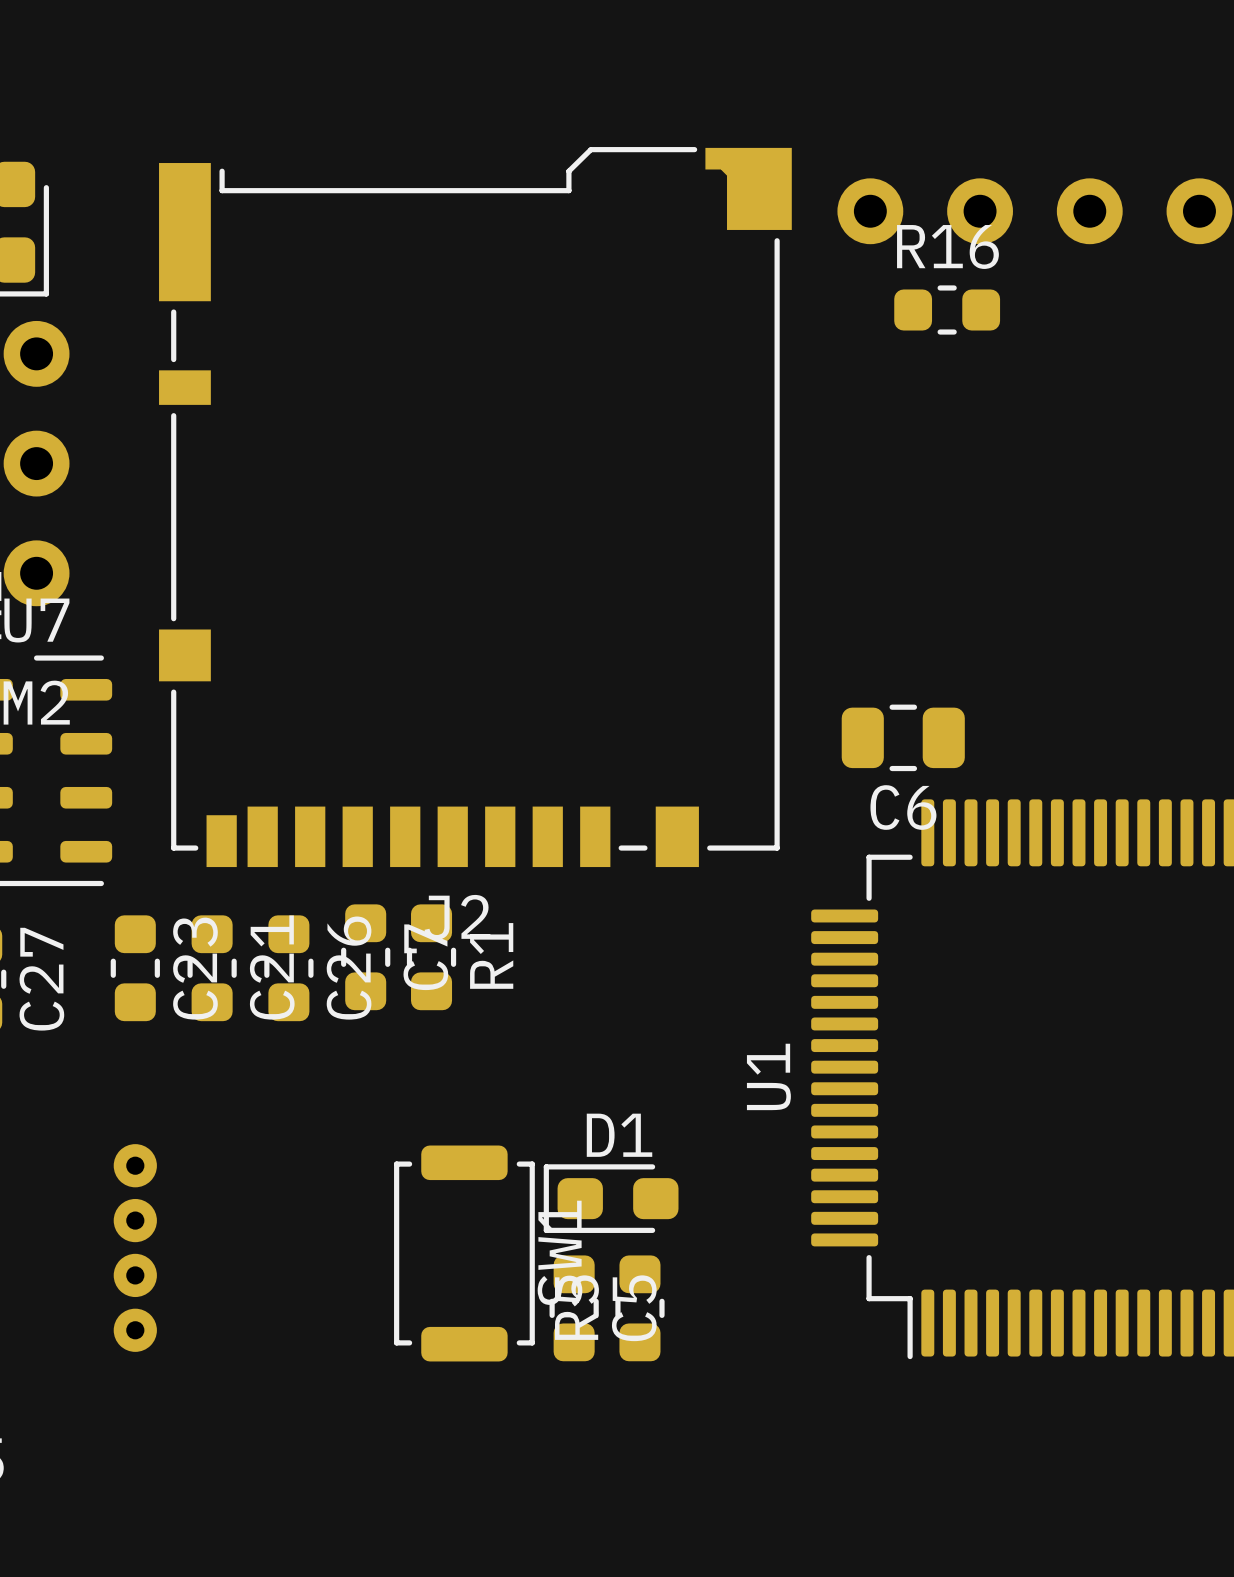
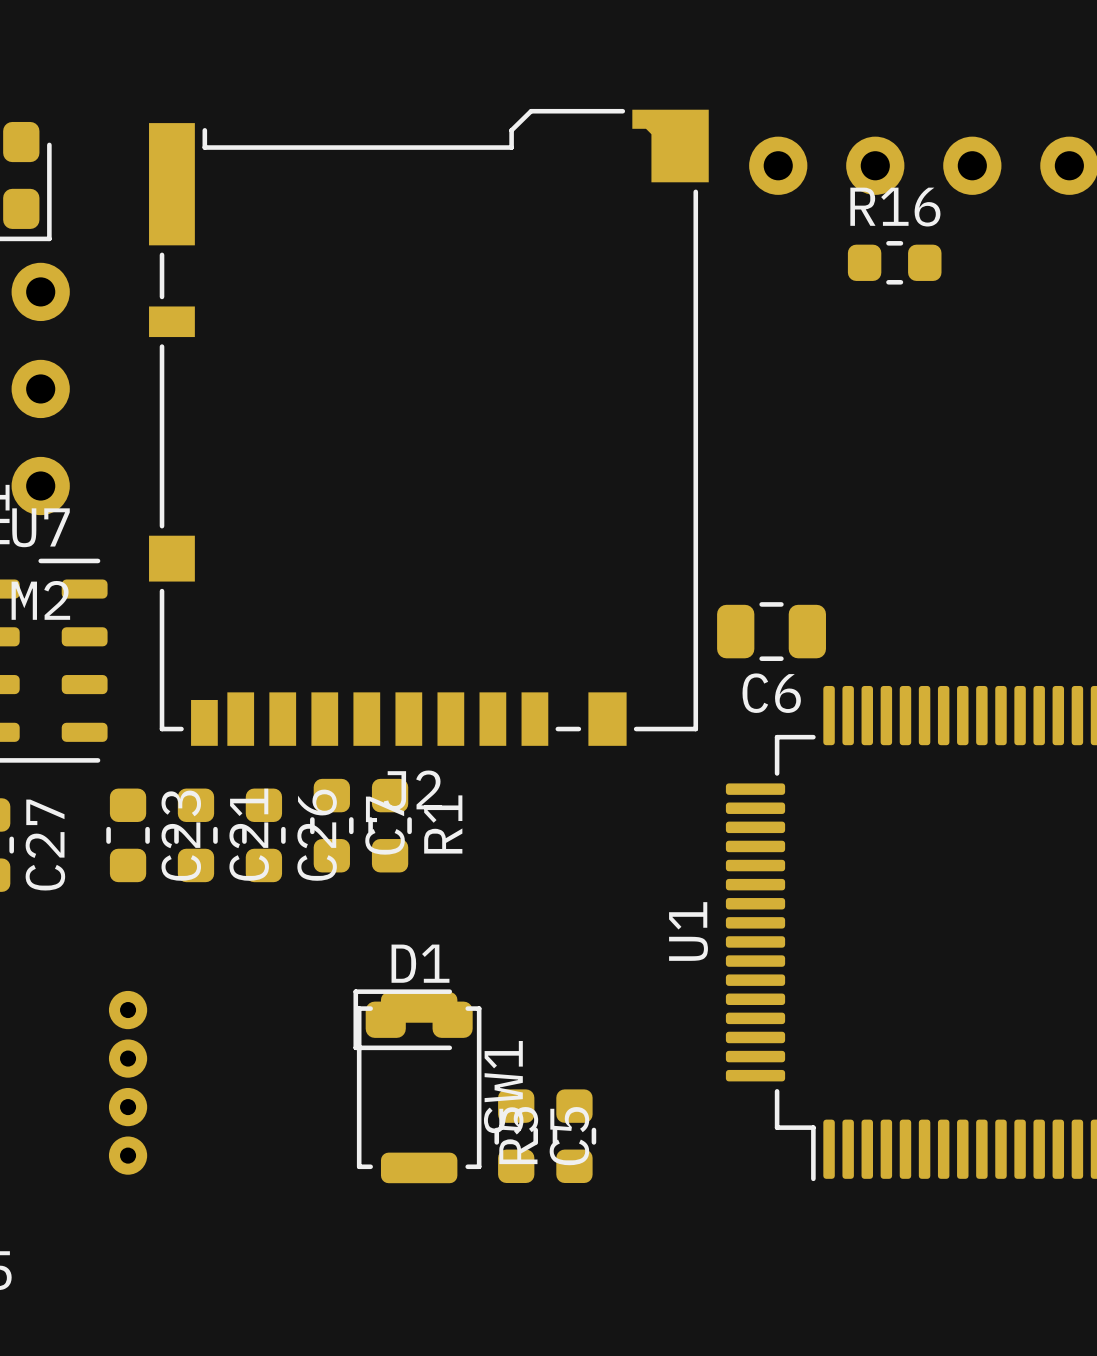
R16 position: (947, 309) -> (894, 262)
C6 position: (903, 737) -> (771, 631)
D1 position: (611, 1198) -> (413, 1019)

